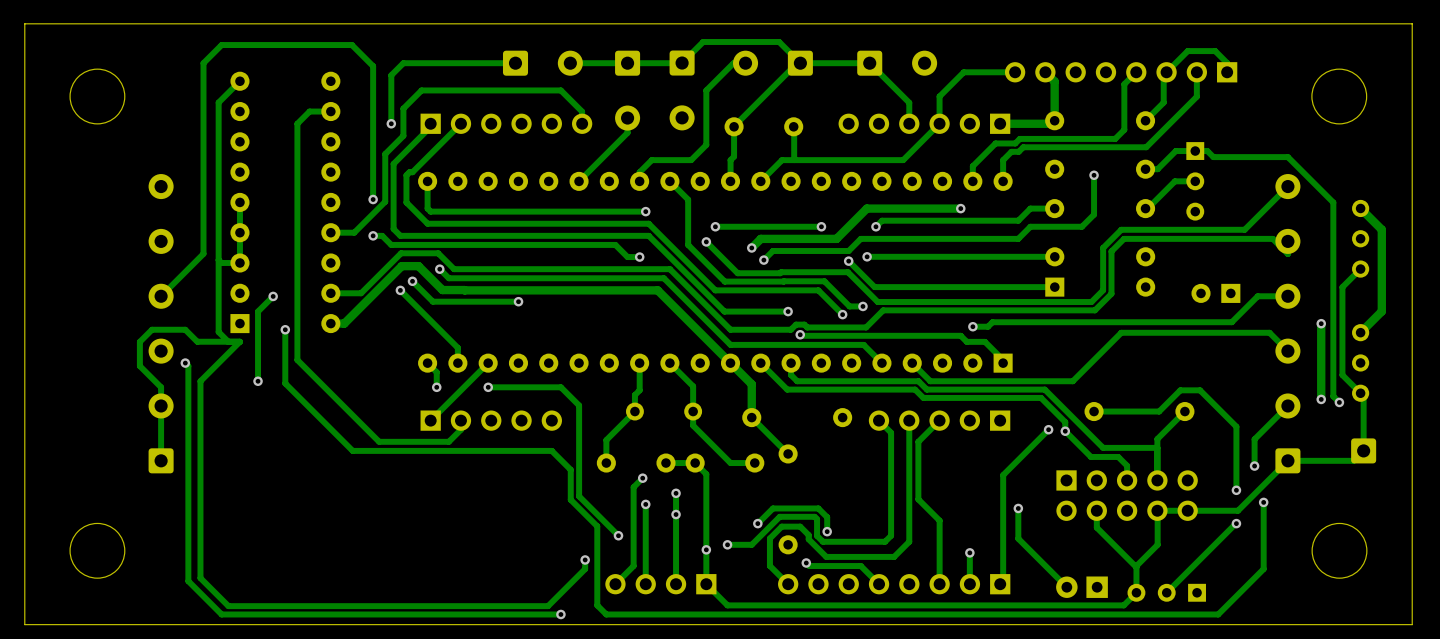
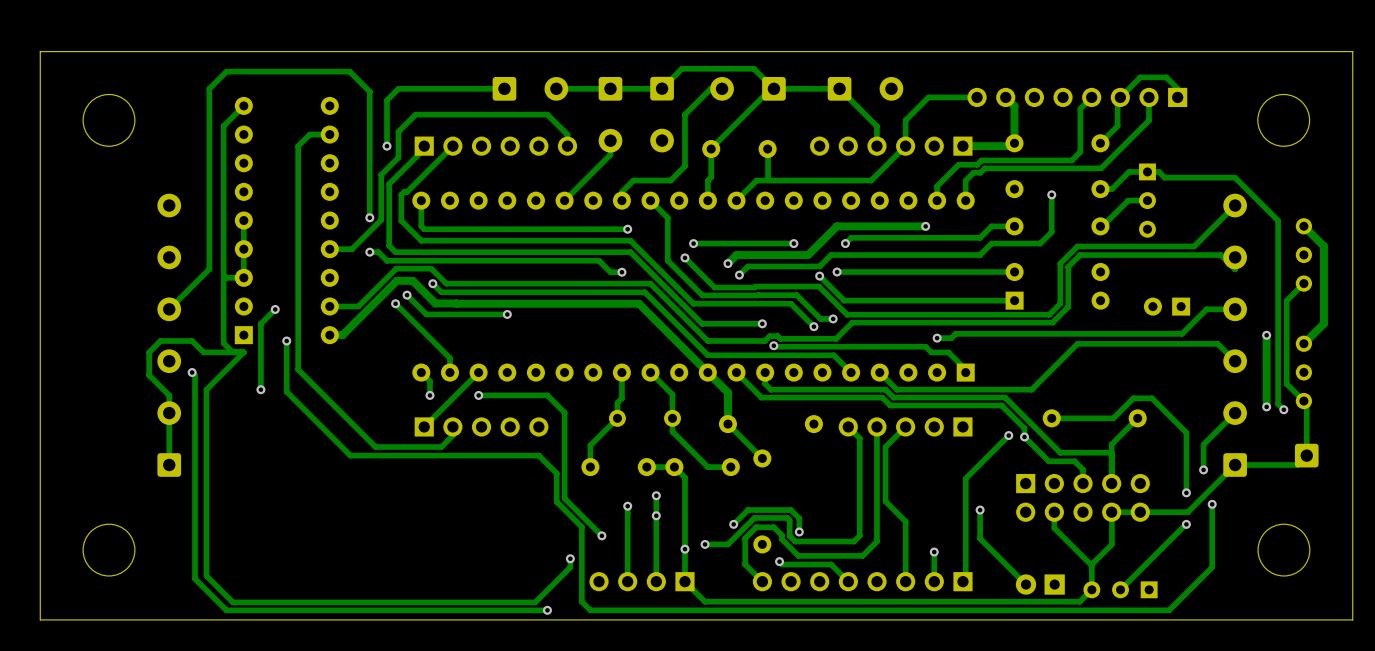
track: (642, 478) (633, 487) (633, 566) (615, 584) -> none
via: (642, 478) -> none

